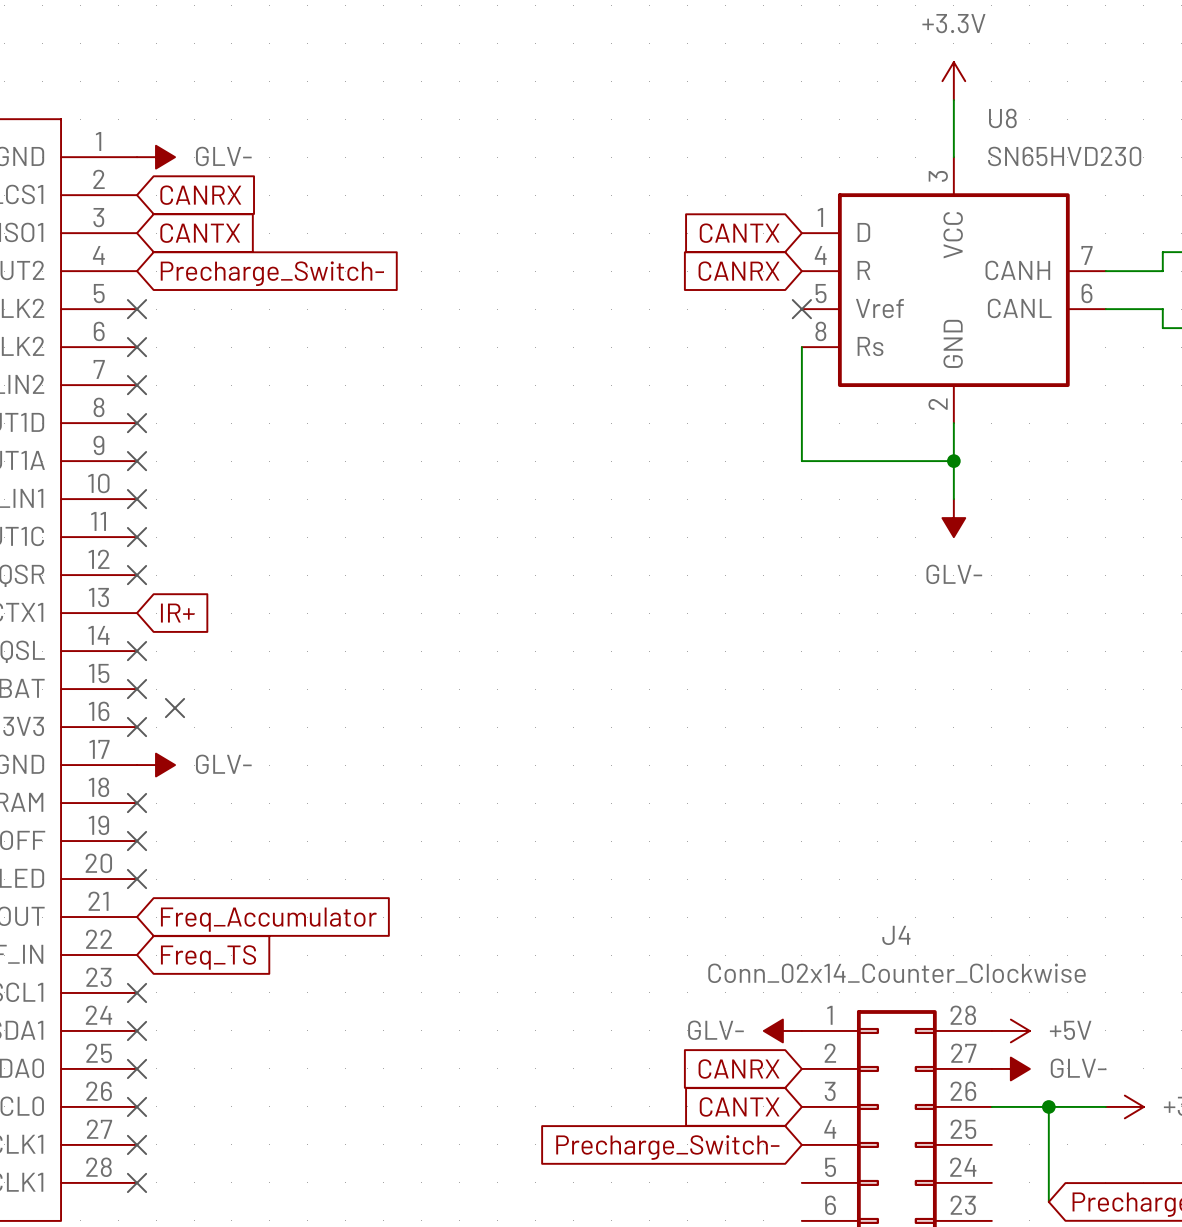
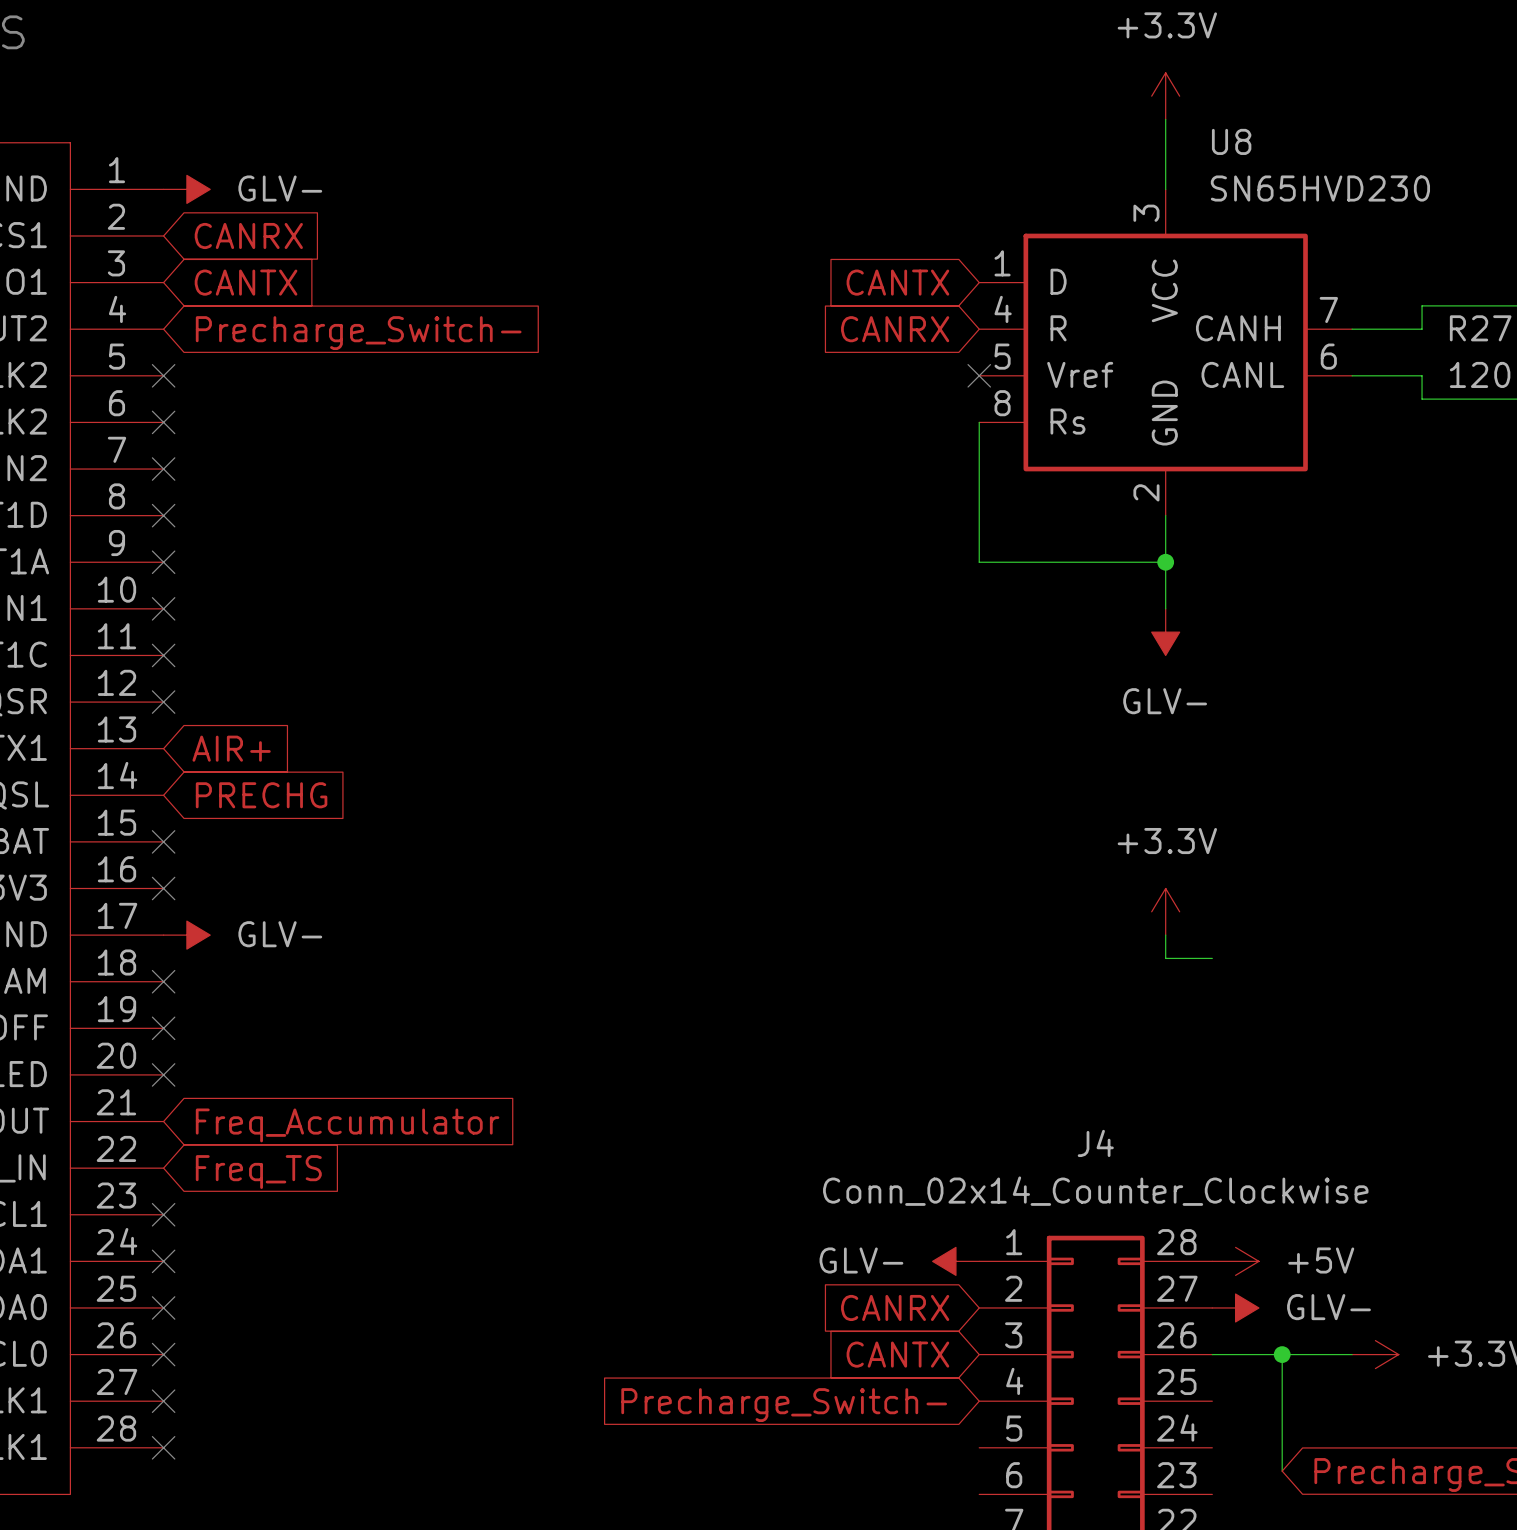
global label: IR+ (177, 613) -> AIR+ (231, 748)
no-connect mark: (137, 651) -> none
global label: none -> PRECHG (261, 795)
no-connect mark: (175, 708) -> none
power symbol: none -> +3.3V (1165, 911)
wire: none -> (1165, 935) (1165, 958) (1212, 958)

